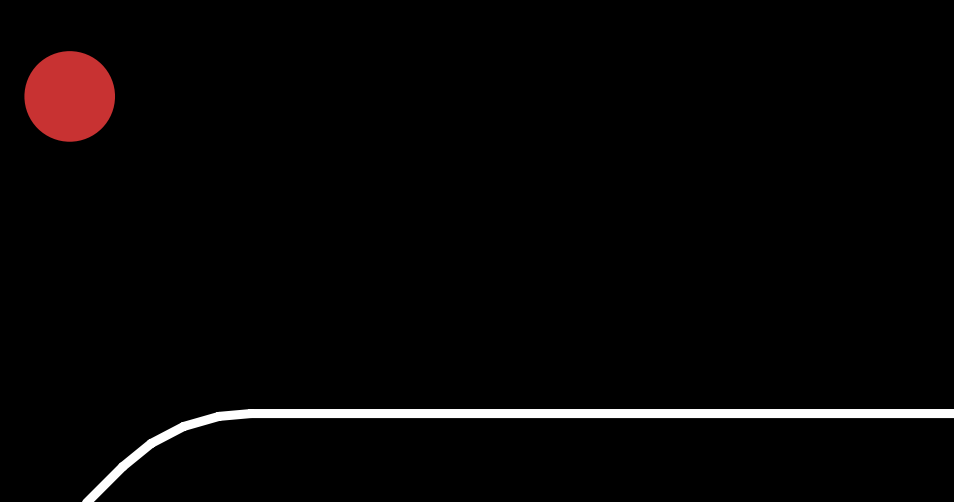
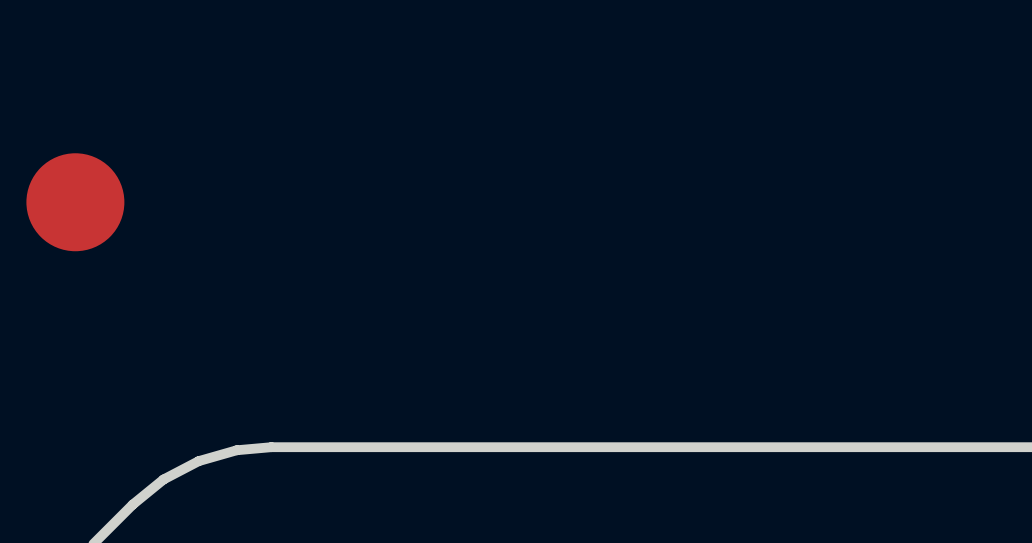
part position: (69, 96) -> (75, 202)

